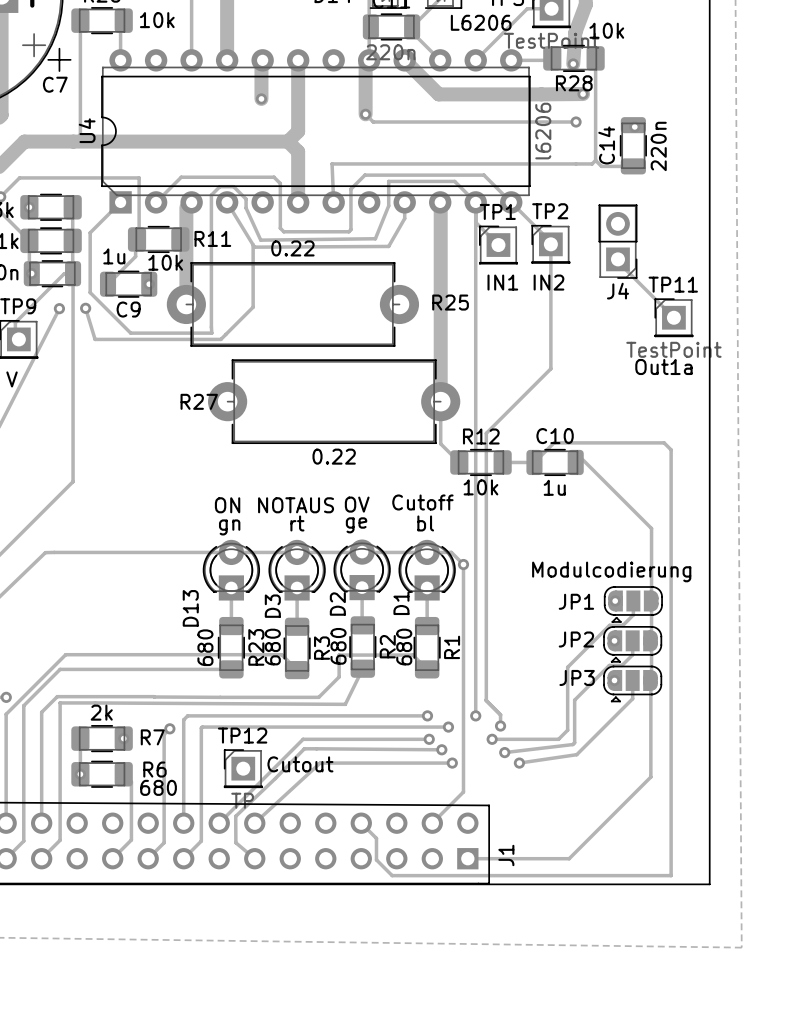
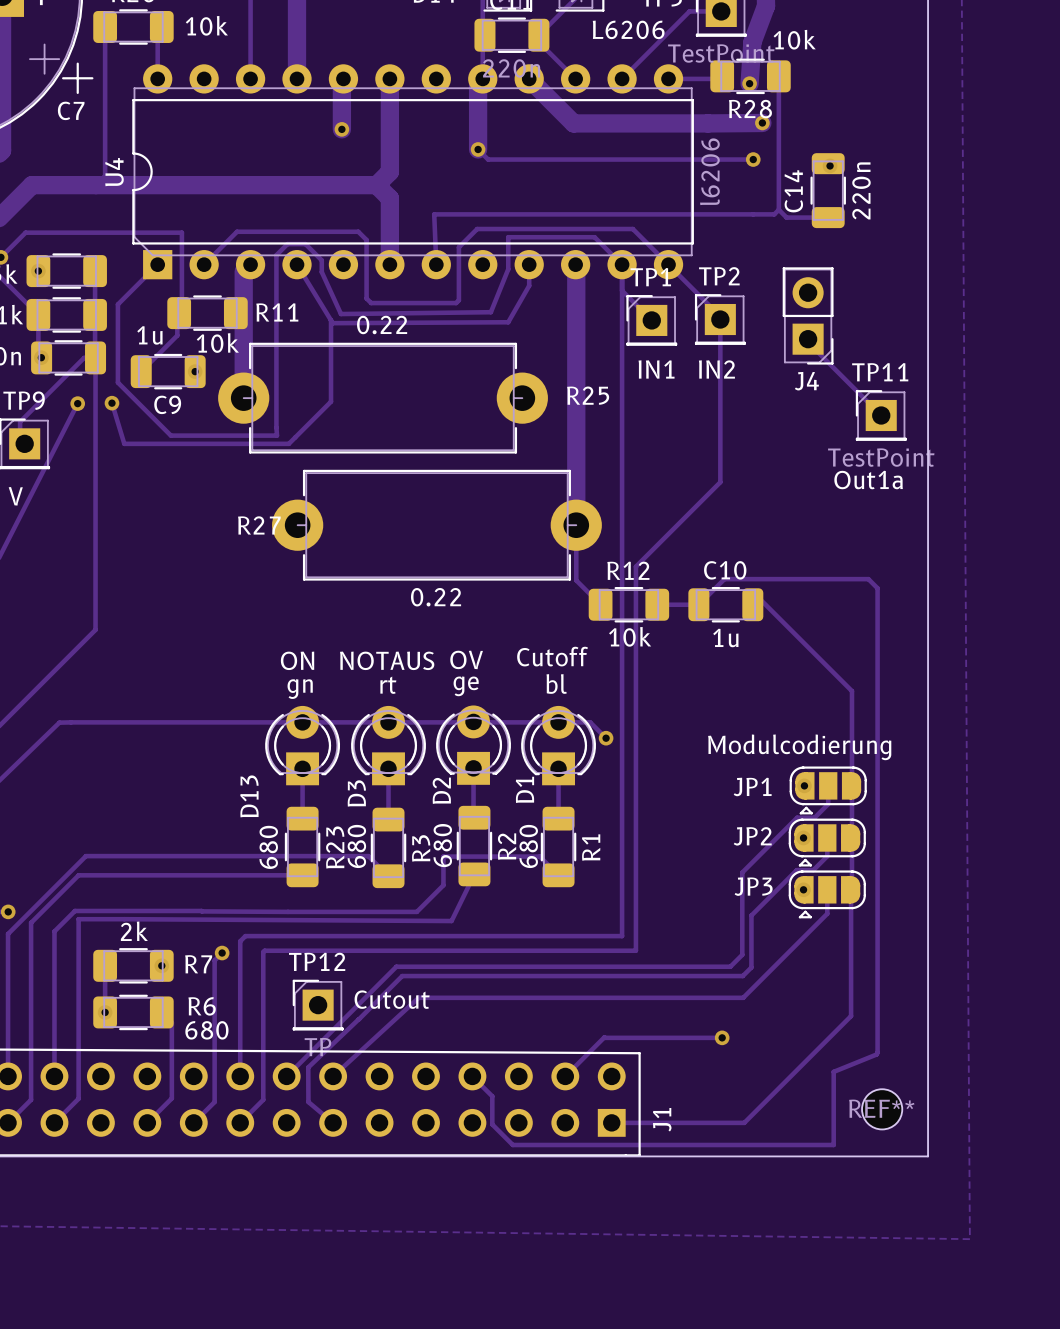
track: (463, 564) (462, 793) -> (722, 1037) (604, 1037)
track: (485, 700) (500, 714) (500, 726) -> none
track: none -> (635, 916) (635, 950)
track: none -> (559, 936) (622, 936)
via: (427, 715) -> none
via: (475, 715) -> none
via: (500, 726) -> none
track: none -> (586, 950) (635, 950)
via: (448, 727) -> none
track: none -> (561, 966) (643, 966)
via: (429, 739) -> none
via: (492, 739) -> none
track: (574, 739) (572, 744) (504, 752) -> none
track: (441, 749) (304, 748) (274, 779) -> (751, 967) (742, 976) (402, 976) (359, 1019)
via: (441, 749) -> none
via: (504, 752) -> none
track: (576, 754) (519, 763) -> (754, 986) (743, 997) (591, 997)
via: (452, 763) -> none
via: (519, 763) -> none
via: none -> (722, 1037)
track: (671, 805) (671, 875) (637, 875) -> (877, 1052) (833, 1071) (833, 1144)
REF**: none -> (882, 1109)

